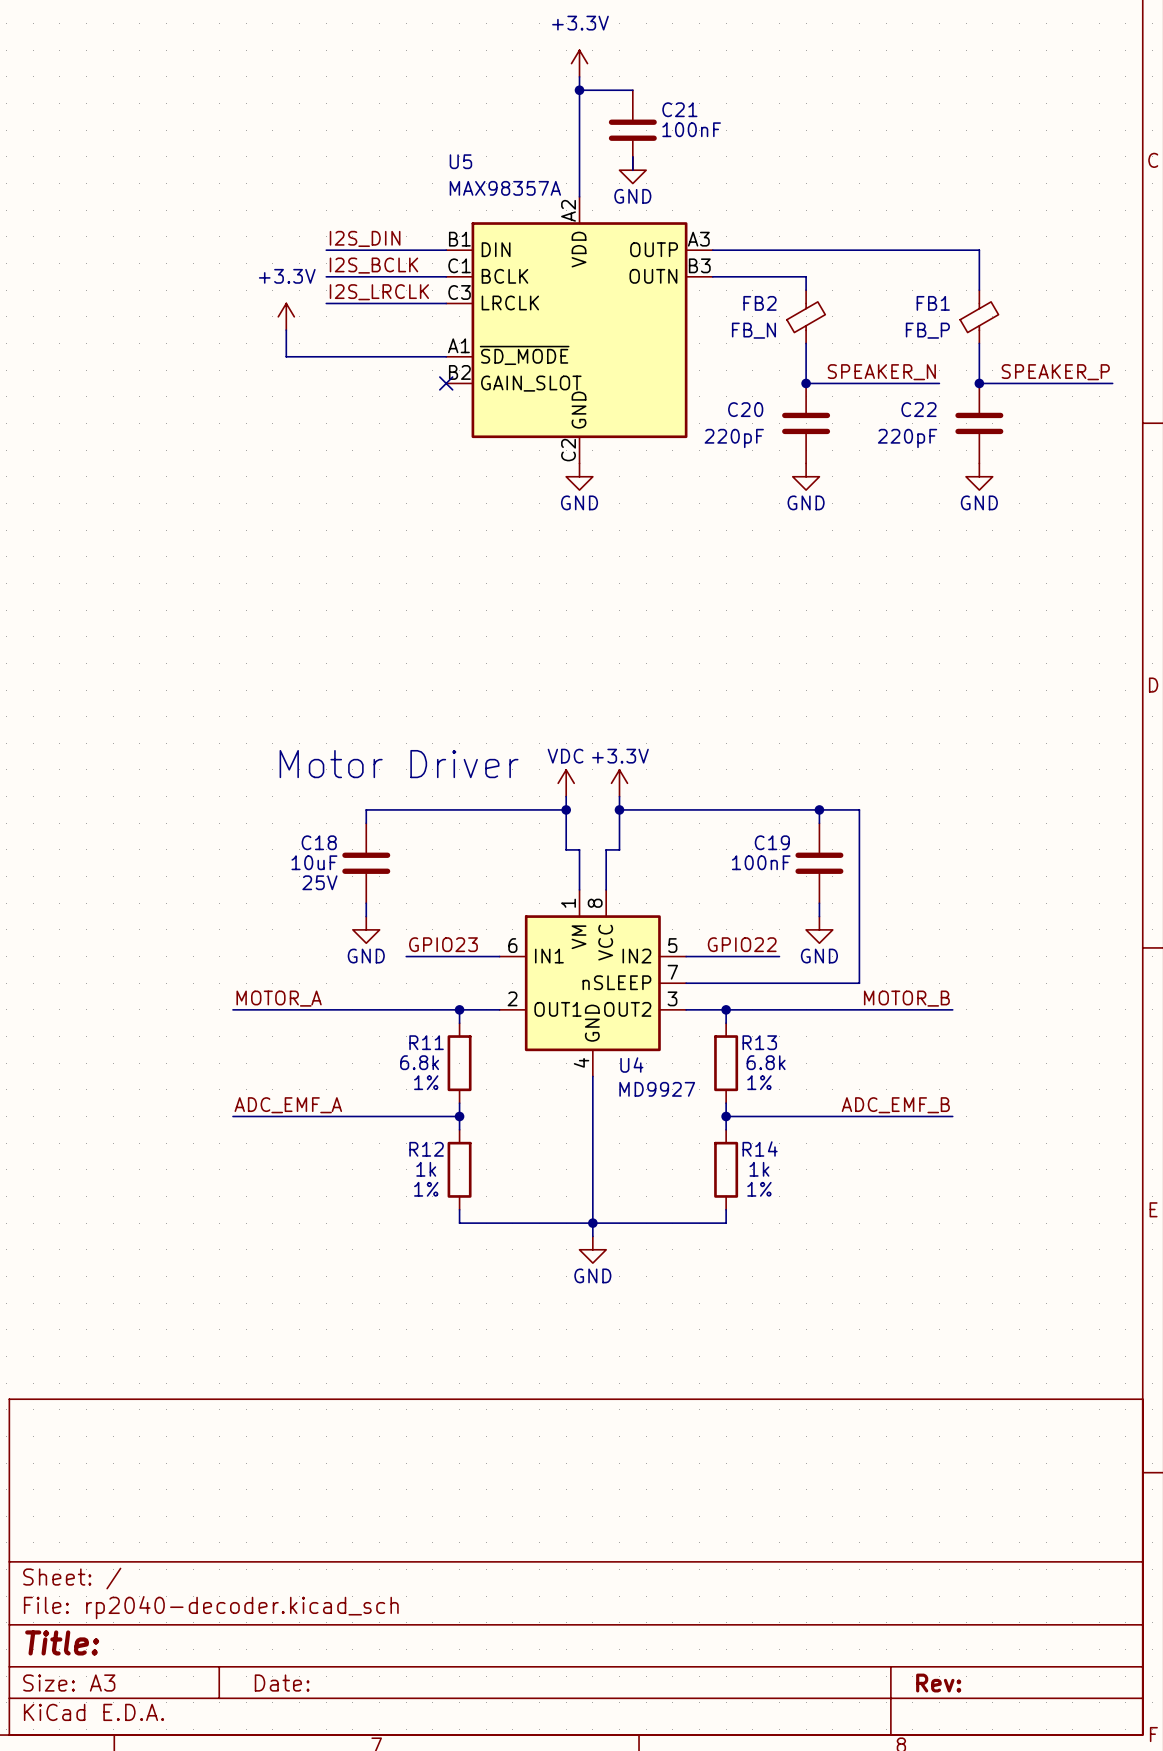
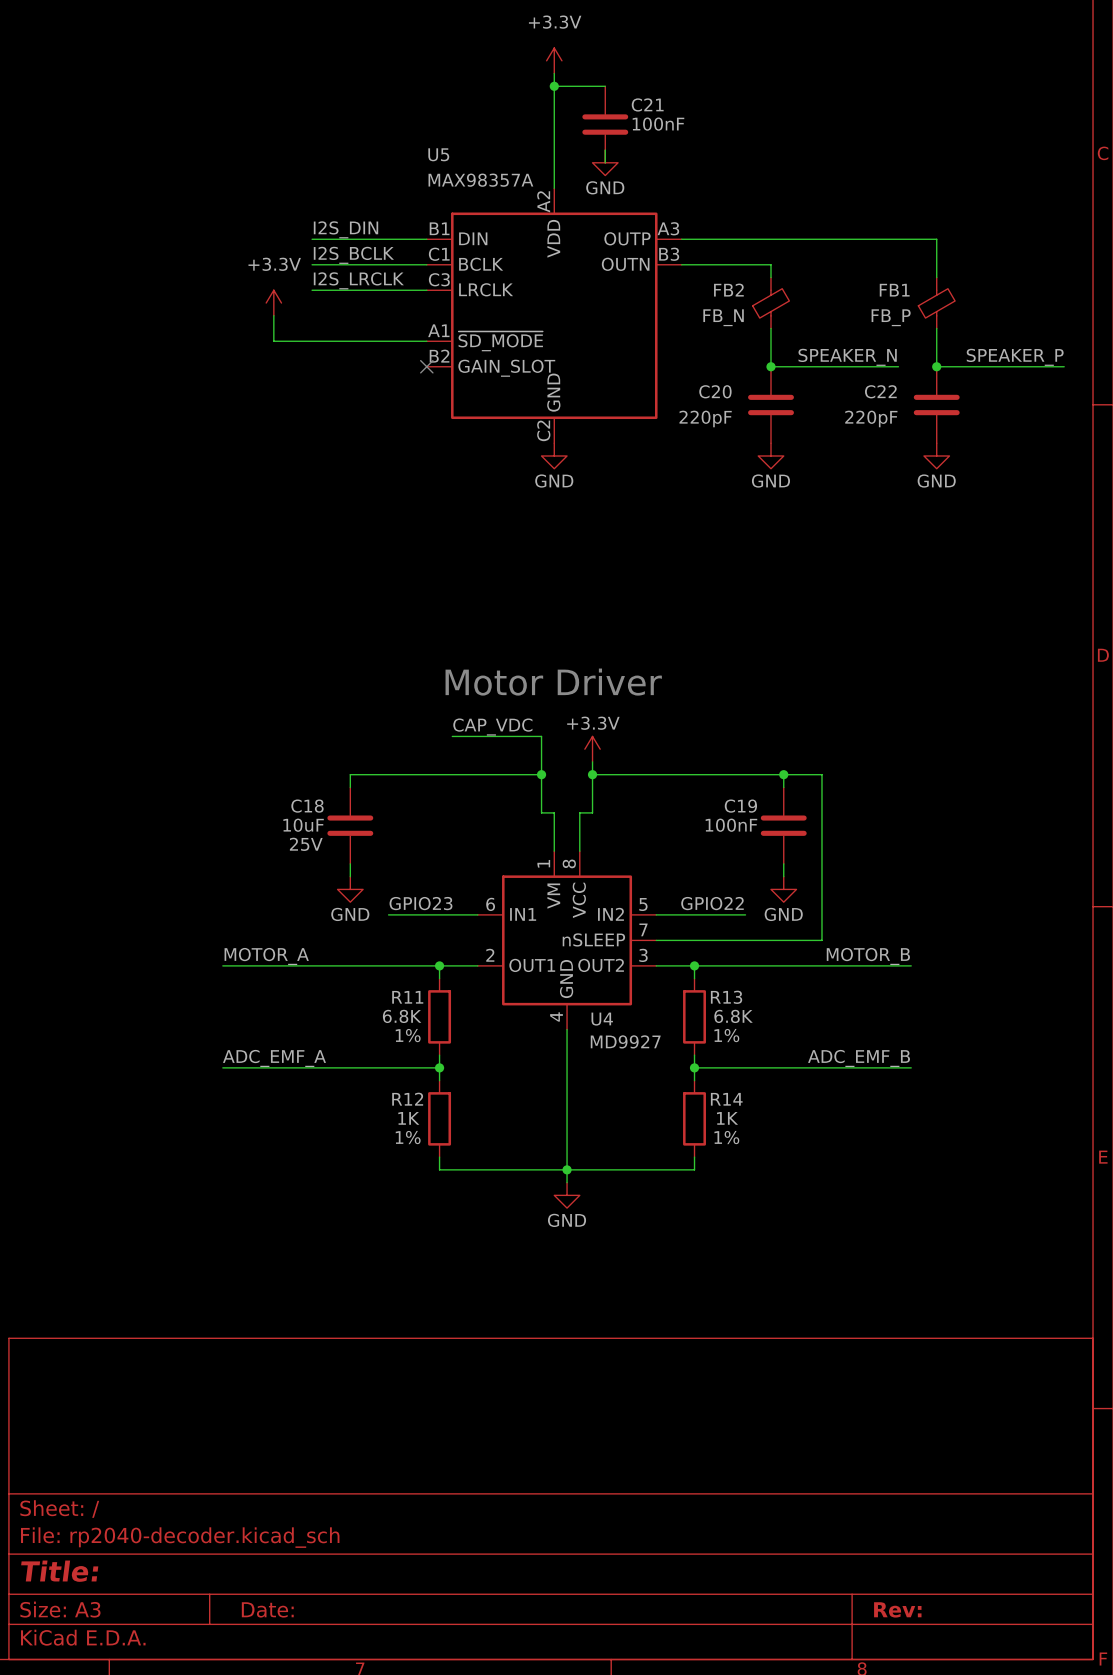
label: none -> CAP_VDC (492, 727)
text position: Motor Driver (399, 764) -> Motor Driver (553, 682)
wire: none -> (452, 736) (541, 736) (541, 761)
power symbol: VDC (566, 783) -> none
R11 value: 6.8k (419, 1062) -> 6.8K (402, 1016)
R13 value: 6.8k (766, 1062) -> 6.8K (733, 1016)
R12 value: 1k (426, 1169) -> 1K (408, 1118)
R14 value: 1k (759, 1169) -> 1K (727, 1118)

